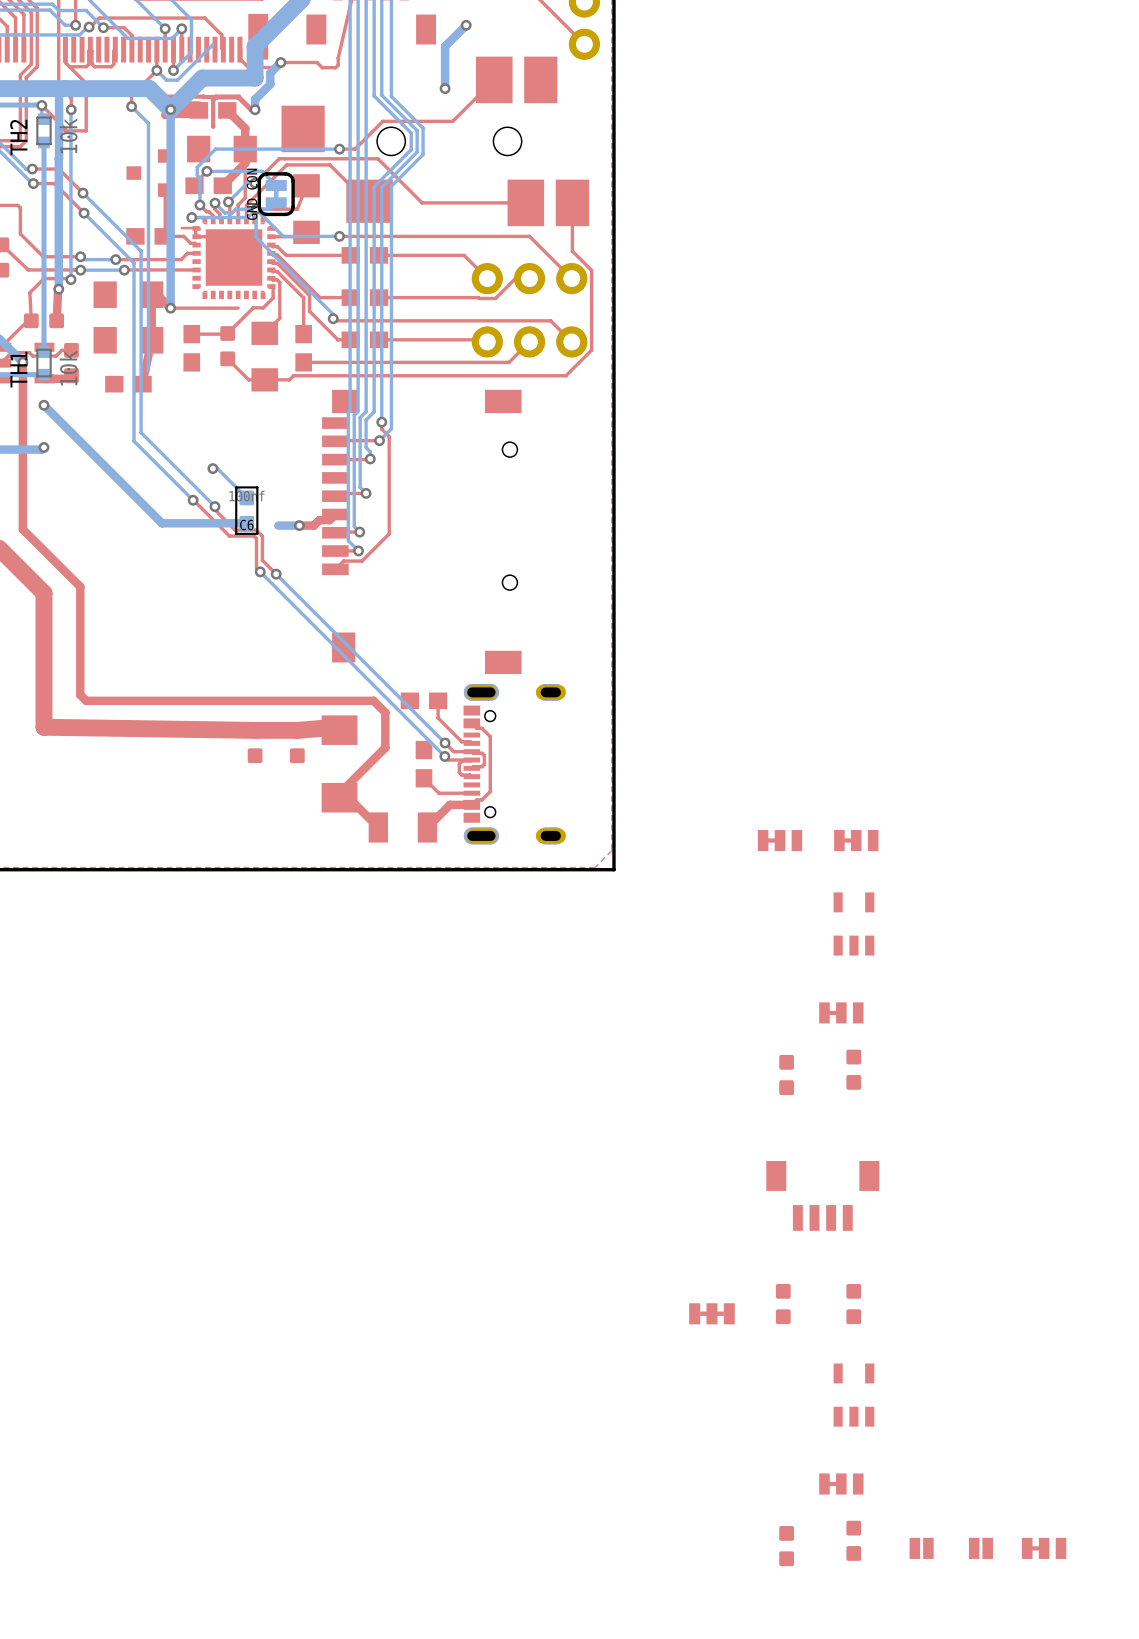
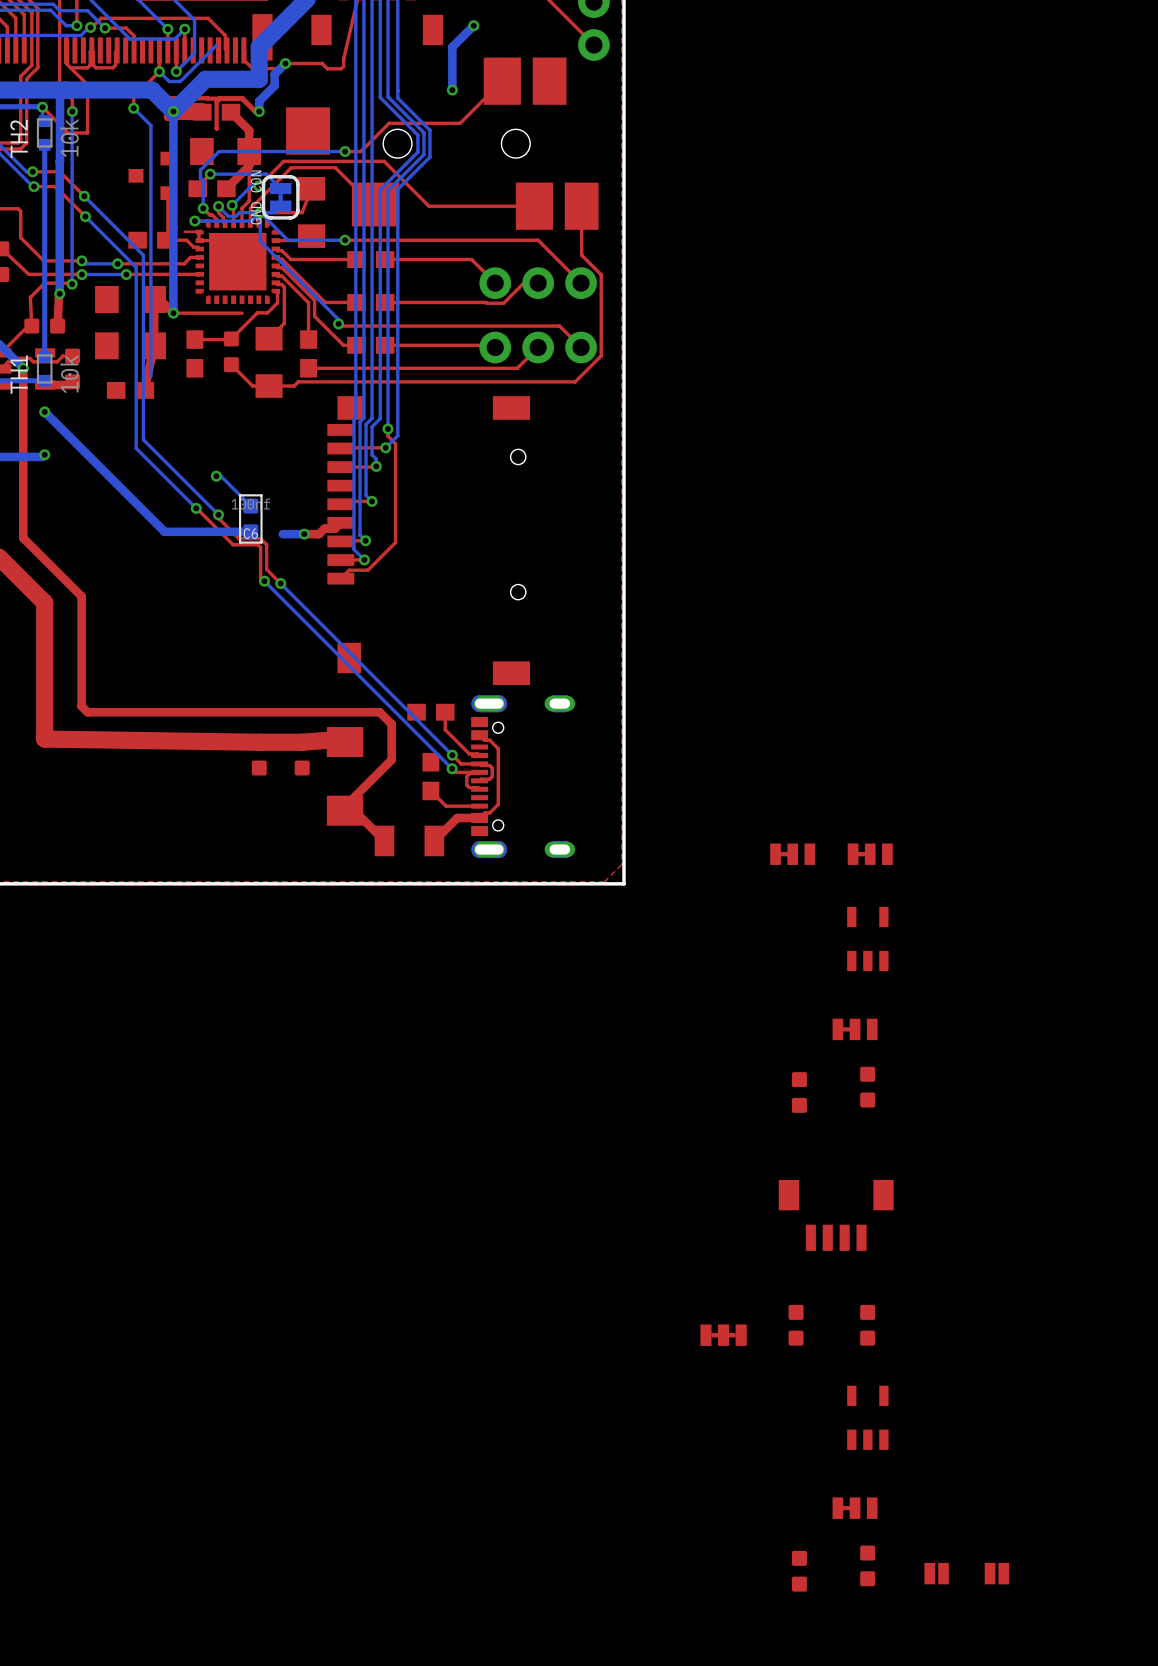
part: (1044, 1548) -> none

